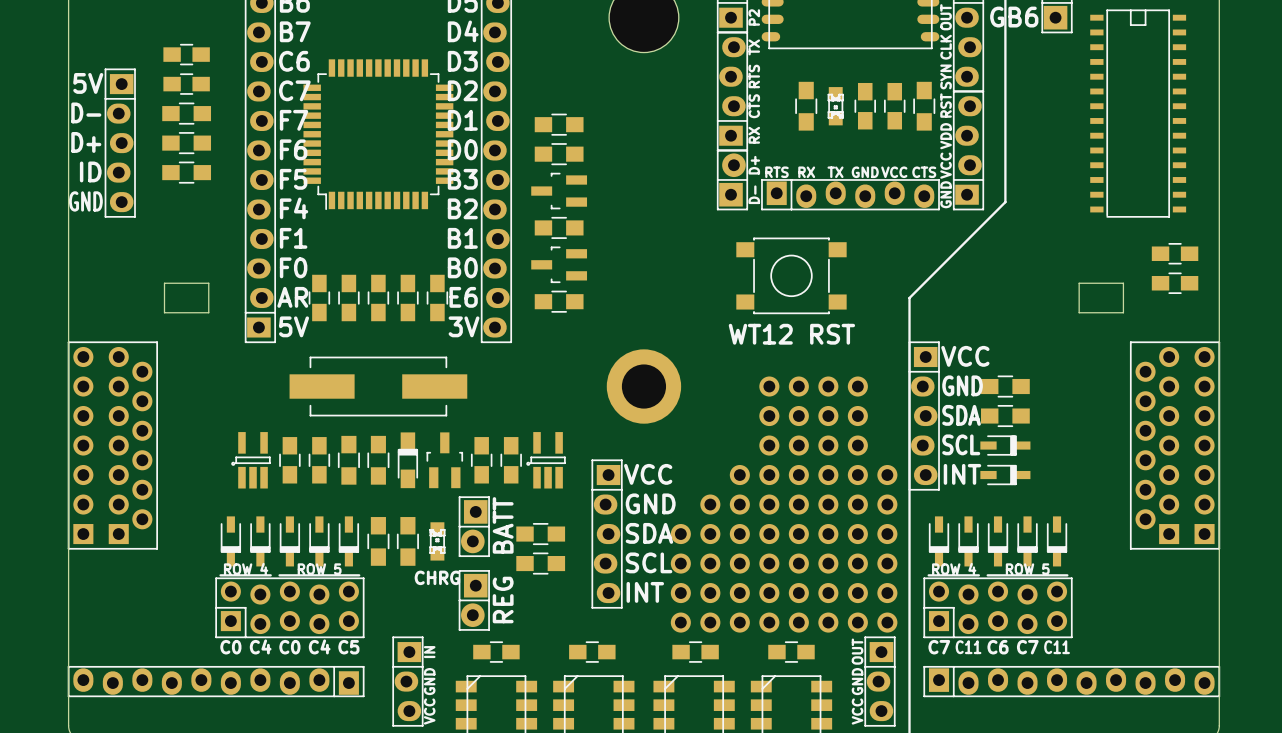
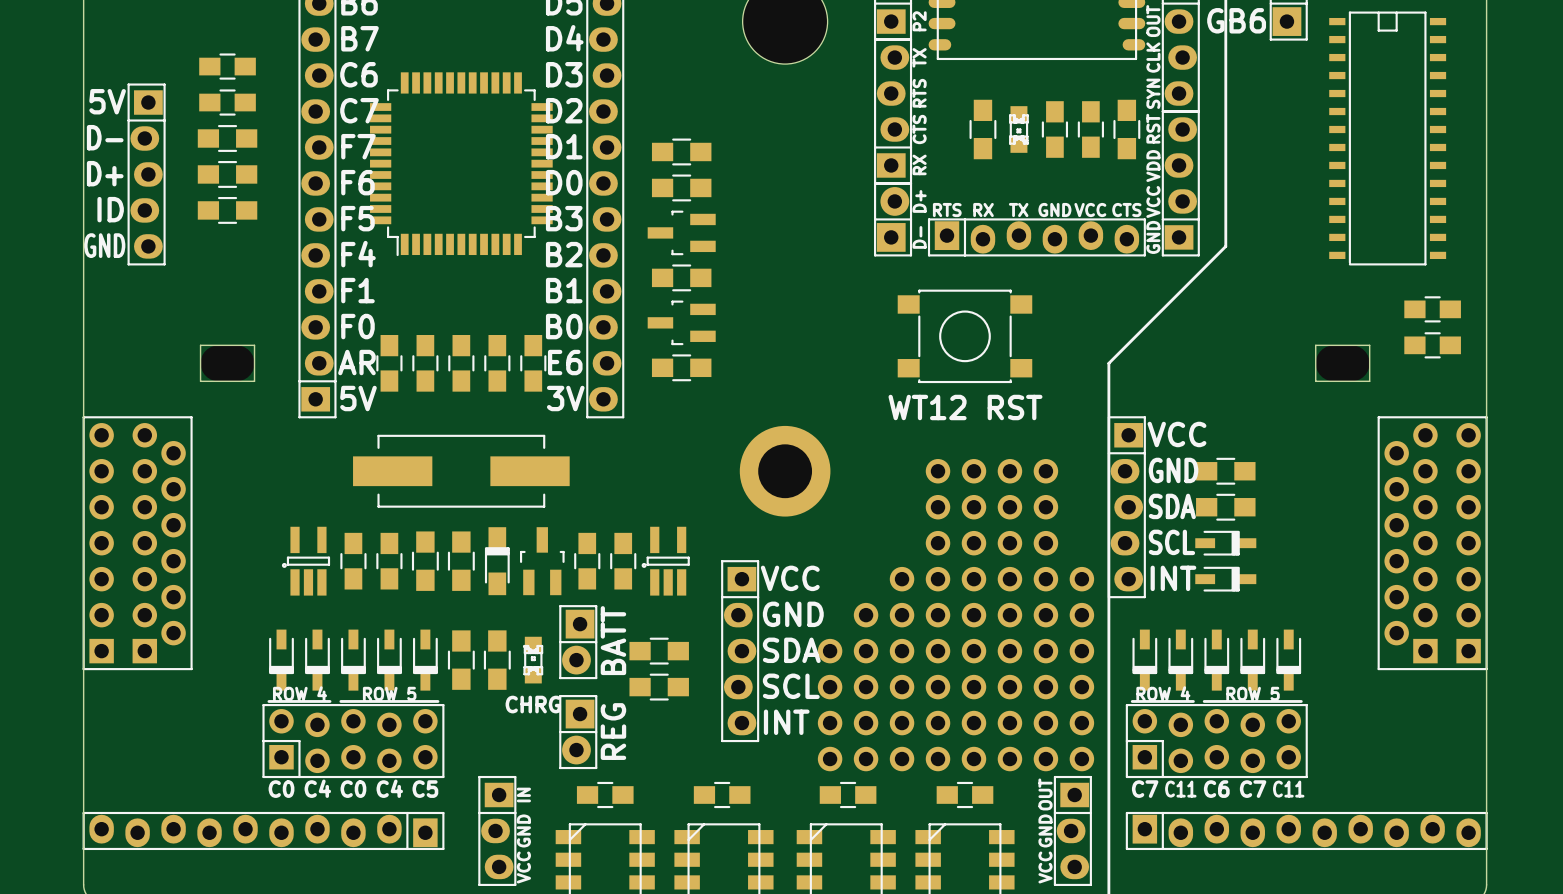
part: none -> (227, 363)
part: none -> (1342, 363)

